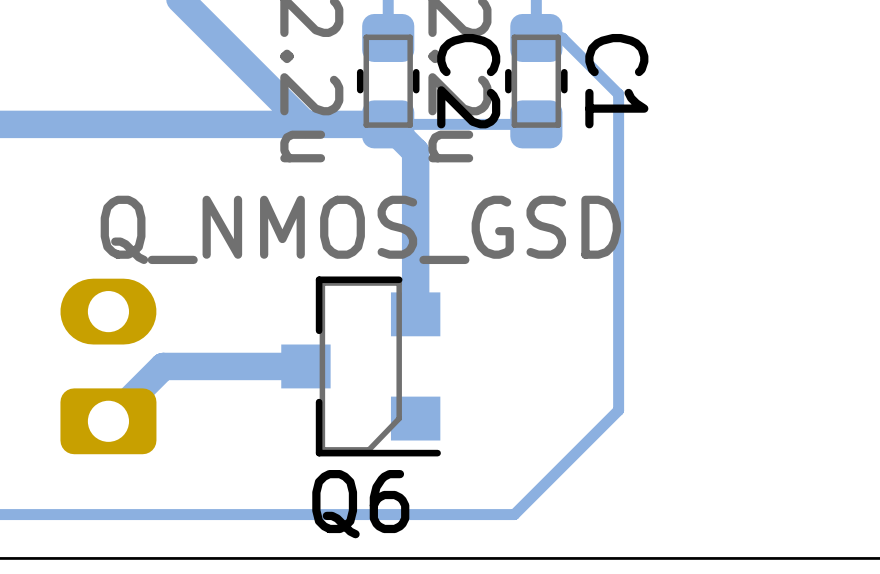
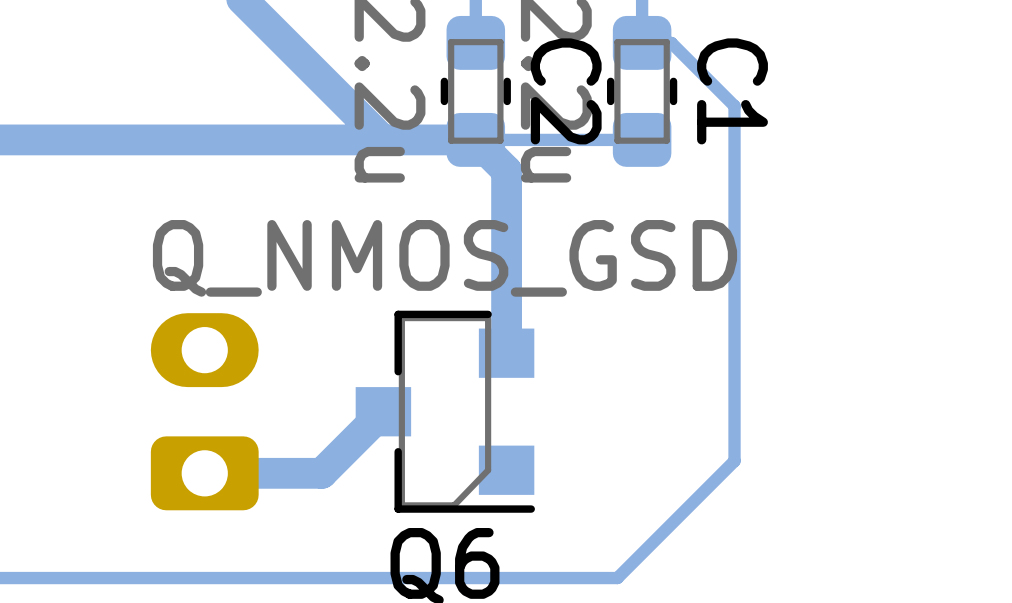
part position: (108, 366) -> (204, 411)
track: (305, 366) (163, 366) (108, 421) -> (383, 411) (321, 473) (204, 473)

